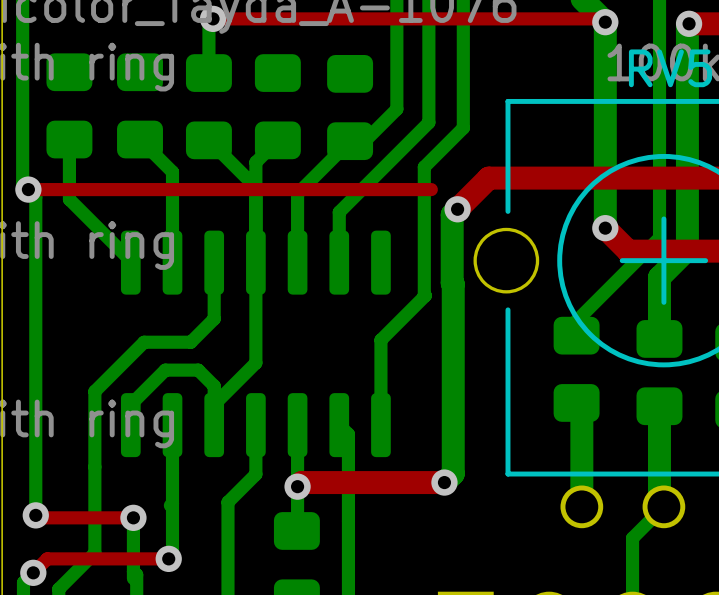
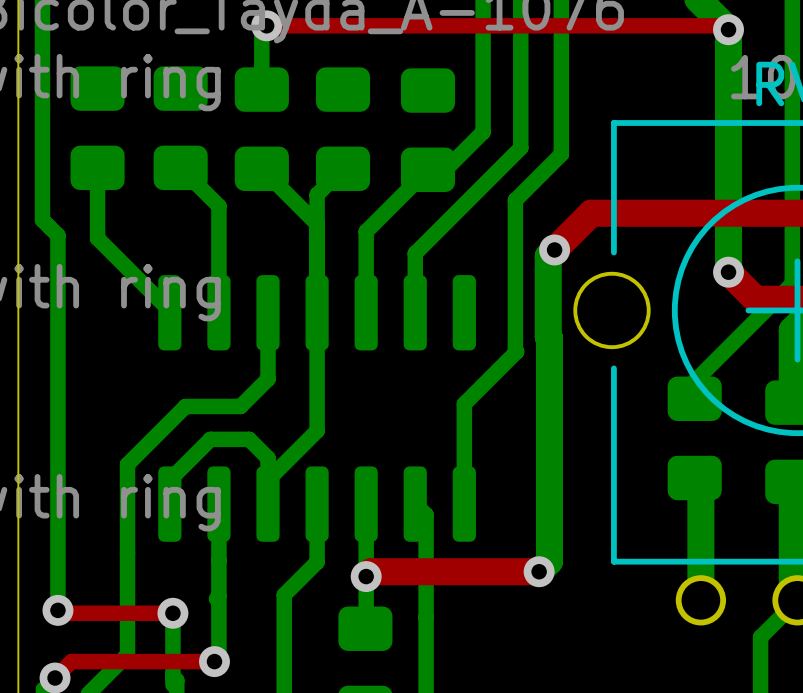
top track: (28, 189) (431, 189) -> none
via: (28, 189) -> none

